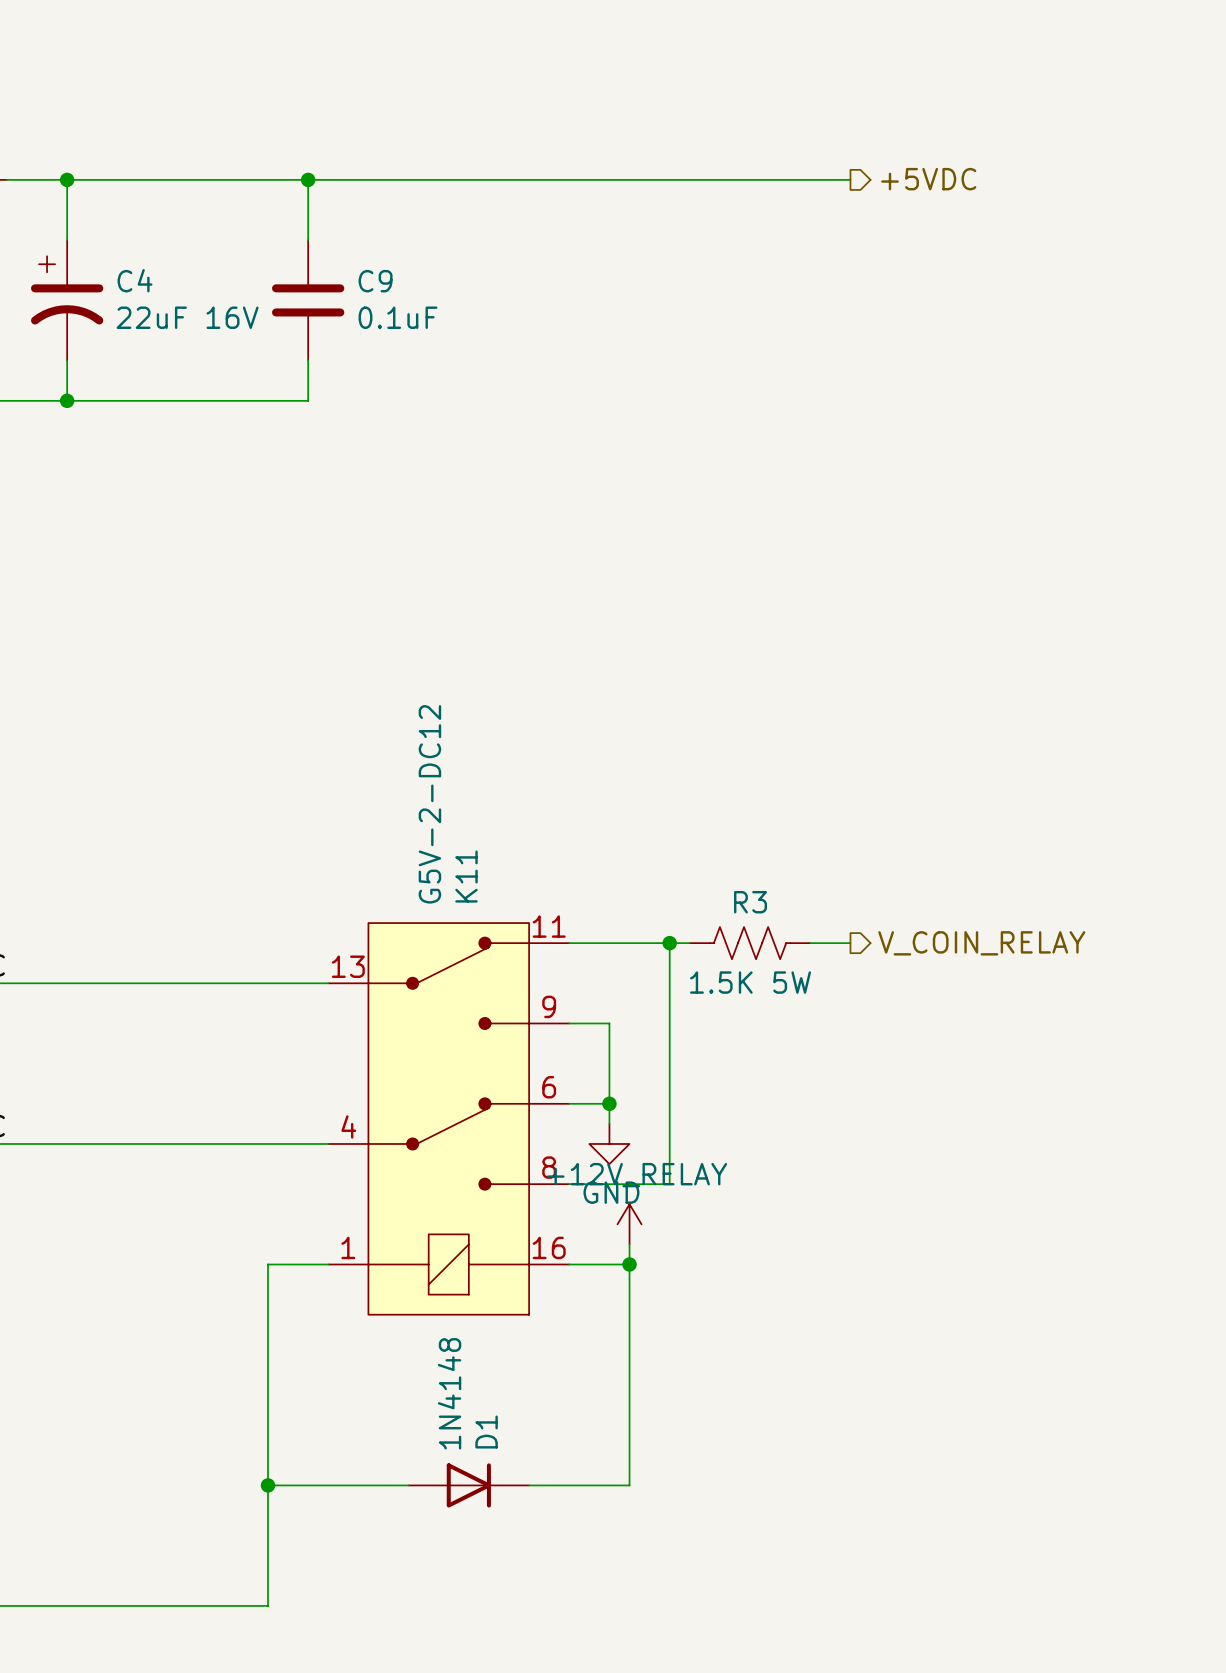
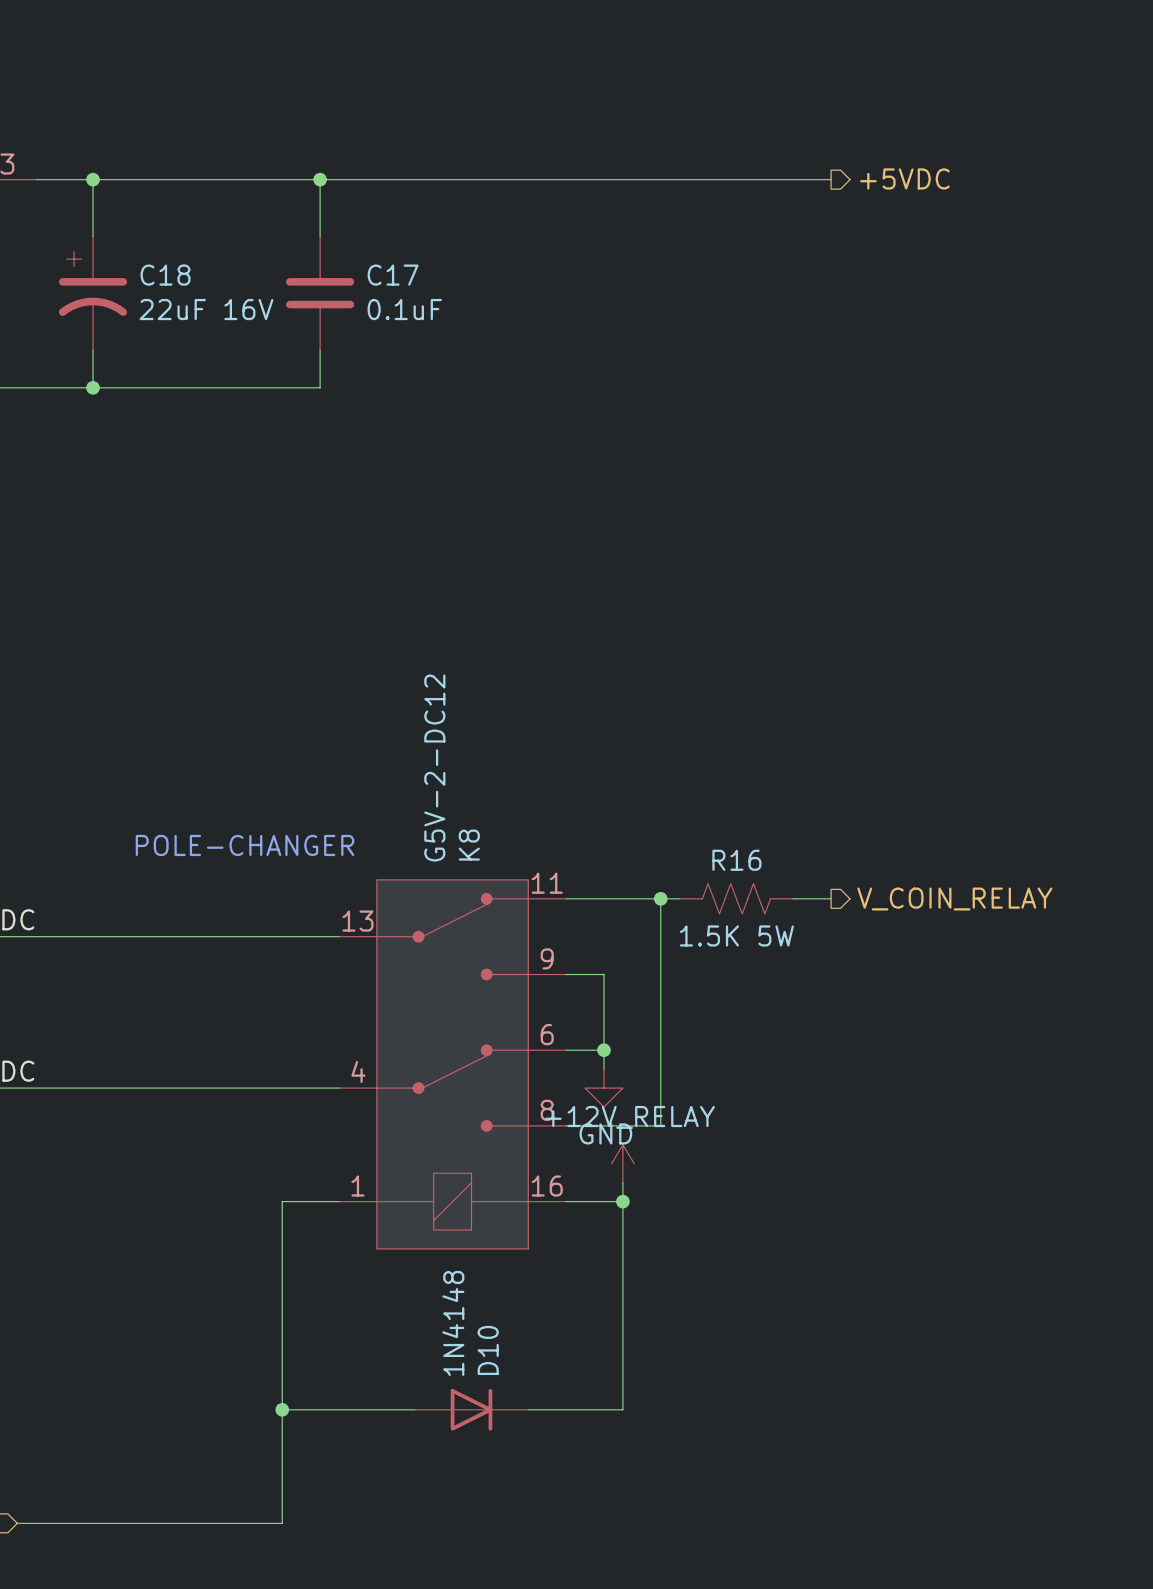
C4 name: C4 (135, 280) -> C18 (165, 275)
C9 name: C9 (375, 281) -> C17 (393, 275)
K11 name: K11 (466, 876) -> K8 (469, 845)
text: none -> POLE-CHANGER (245, 845)
R3 name: R3 (750, 902) -> R16 (736, 860)
D1 name: D1 (486, 1432) -> D10 (488, 1350)

